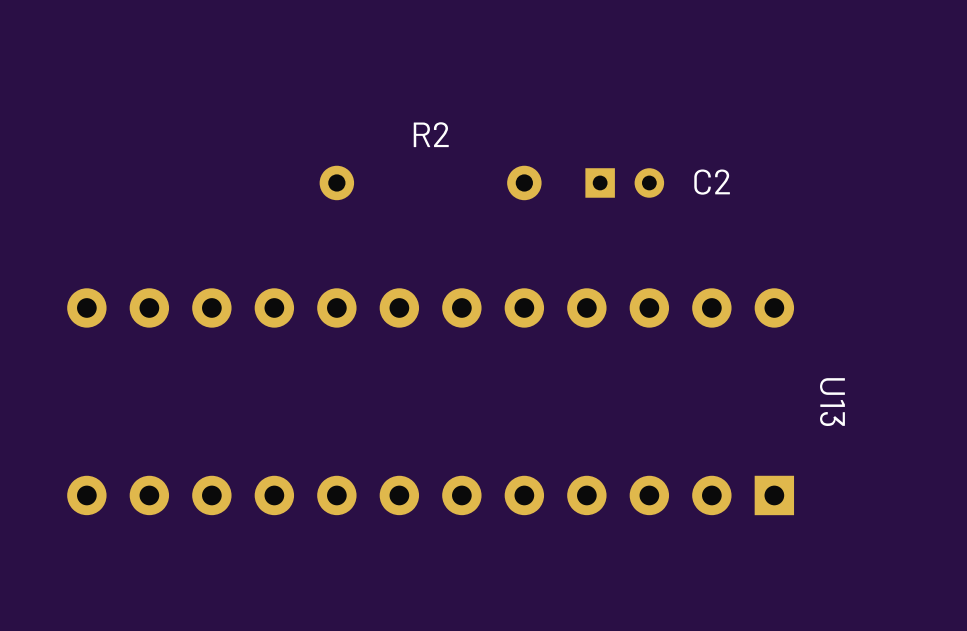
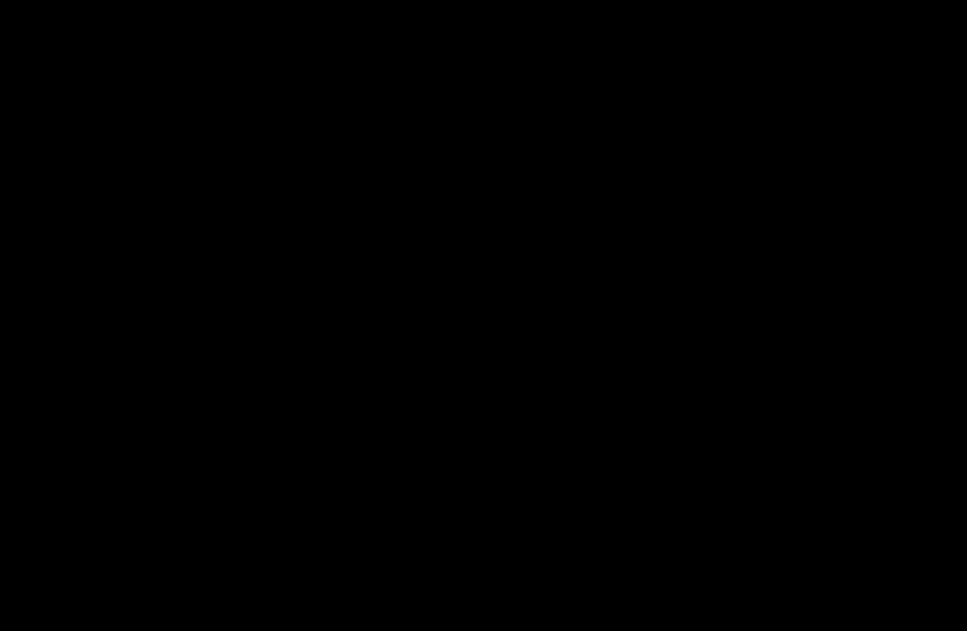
R2: (430, 182) -> none
C2: (624, 182) -> none
U13: (430, 401) -> none

